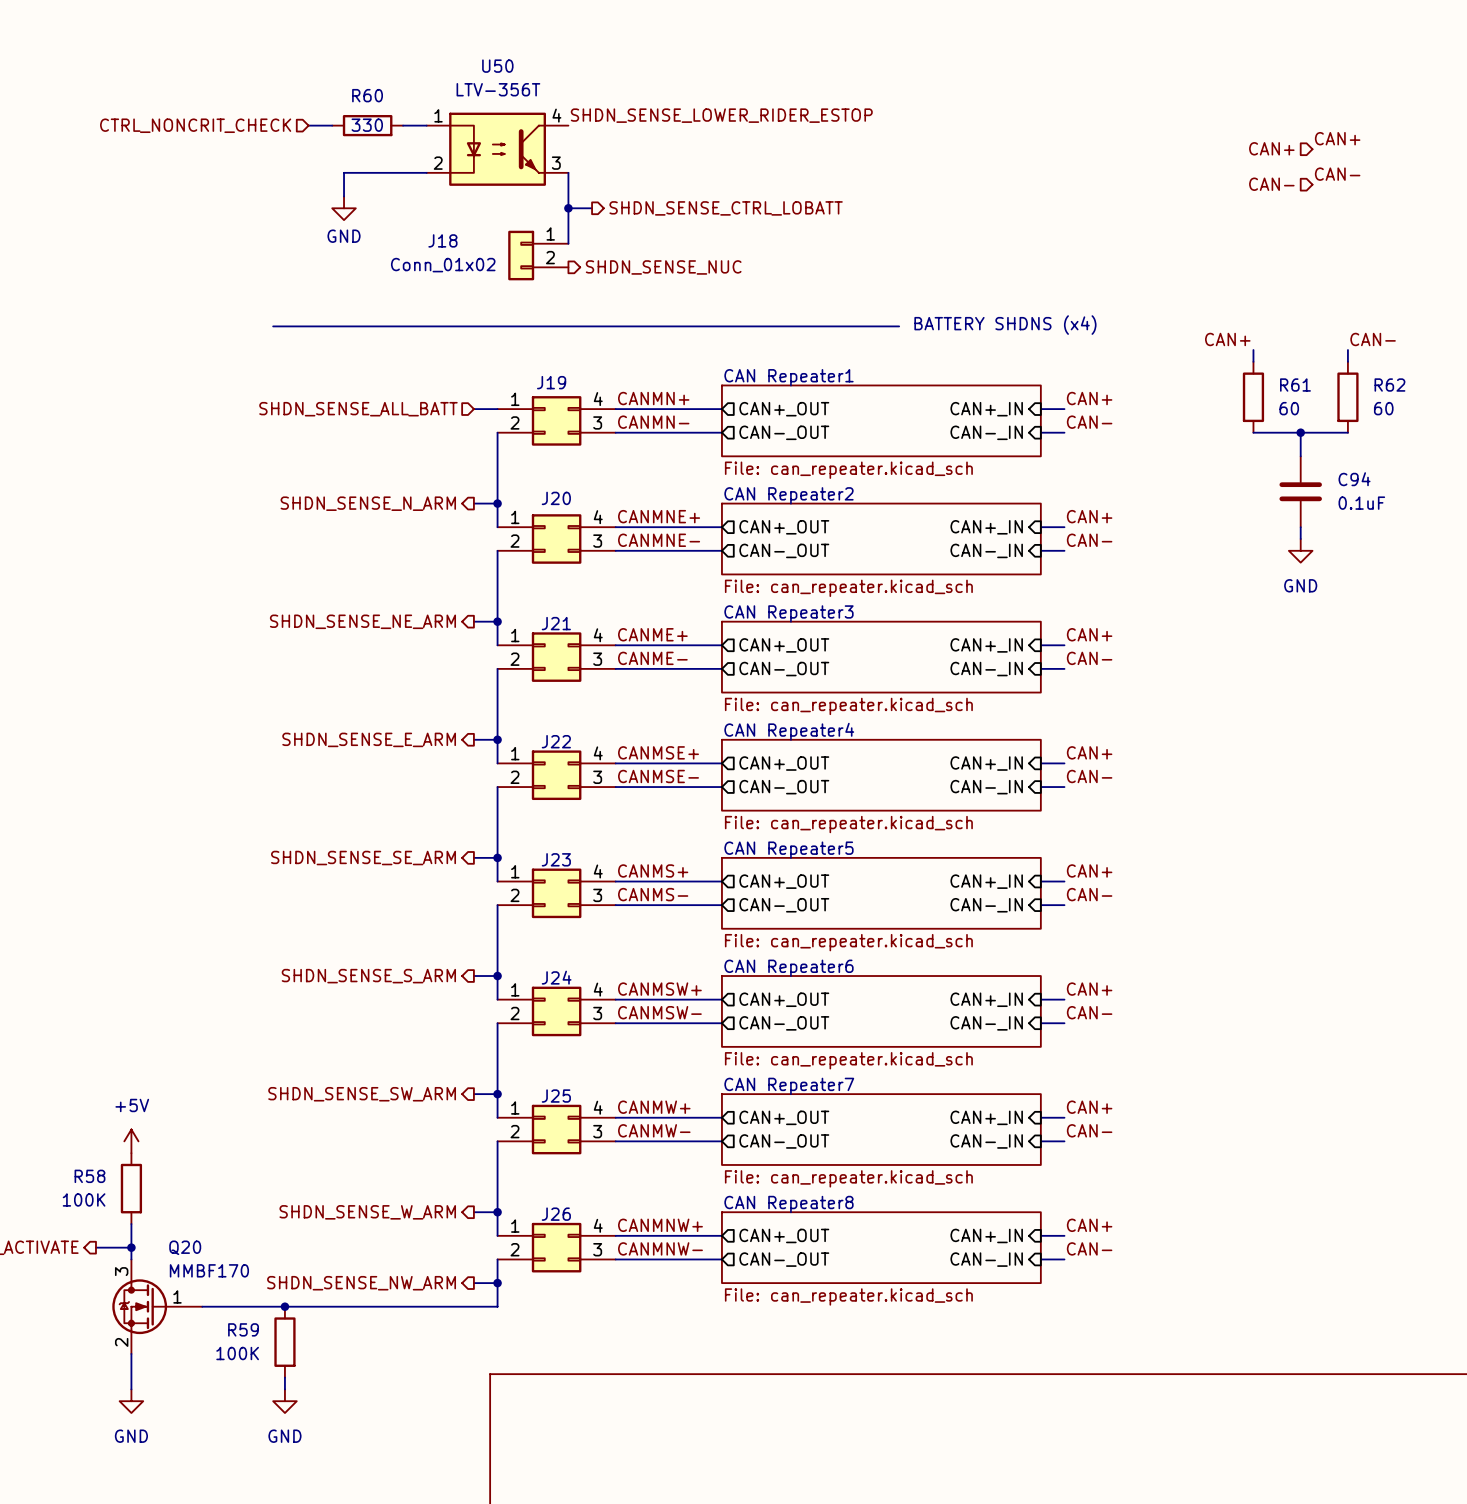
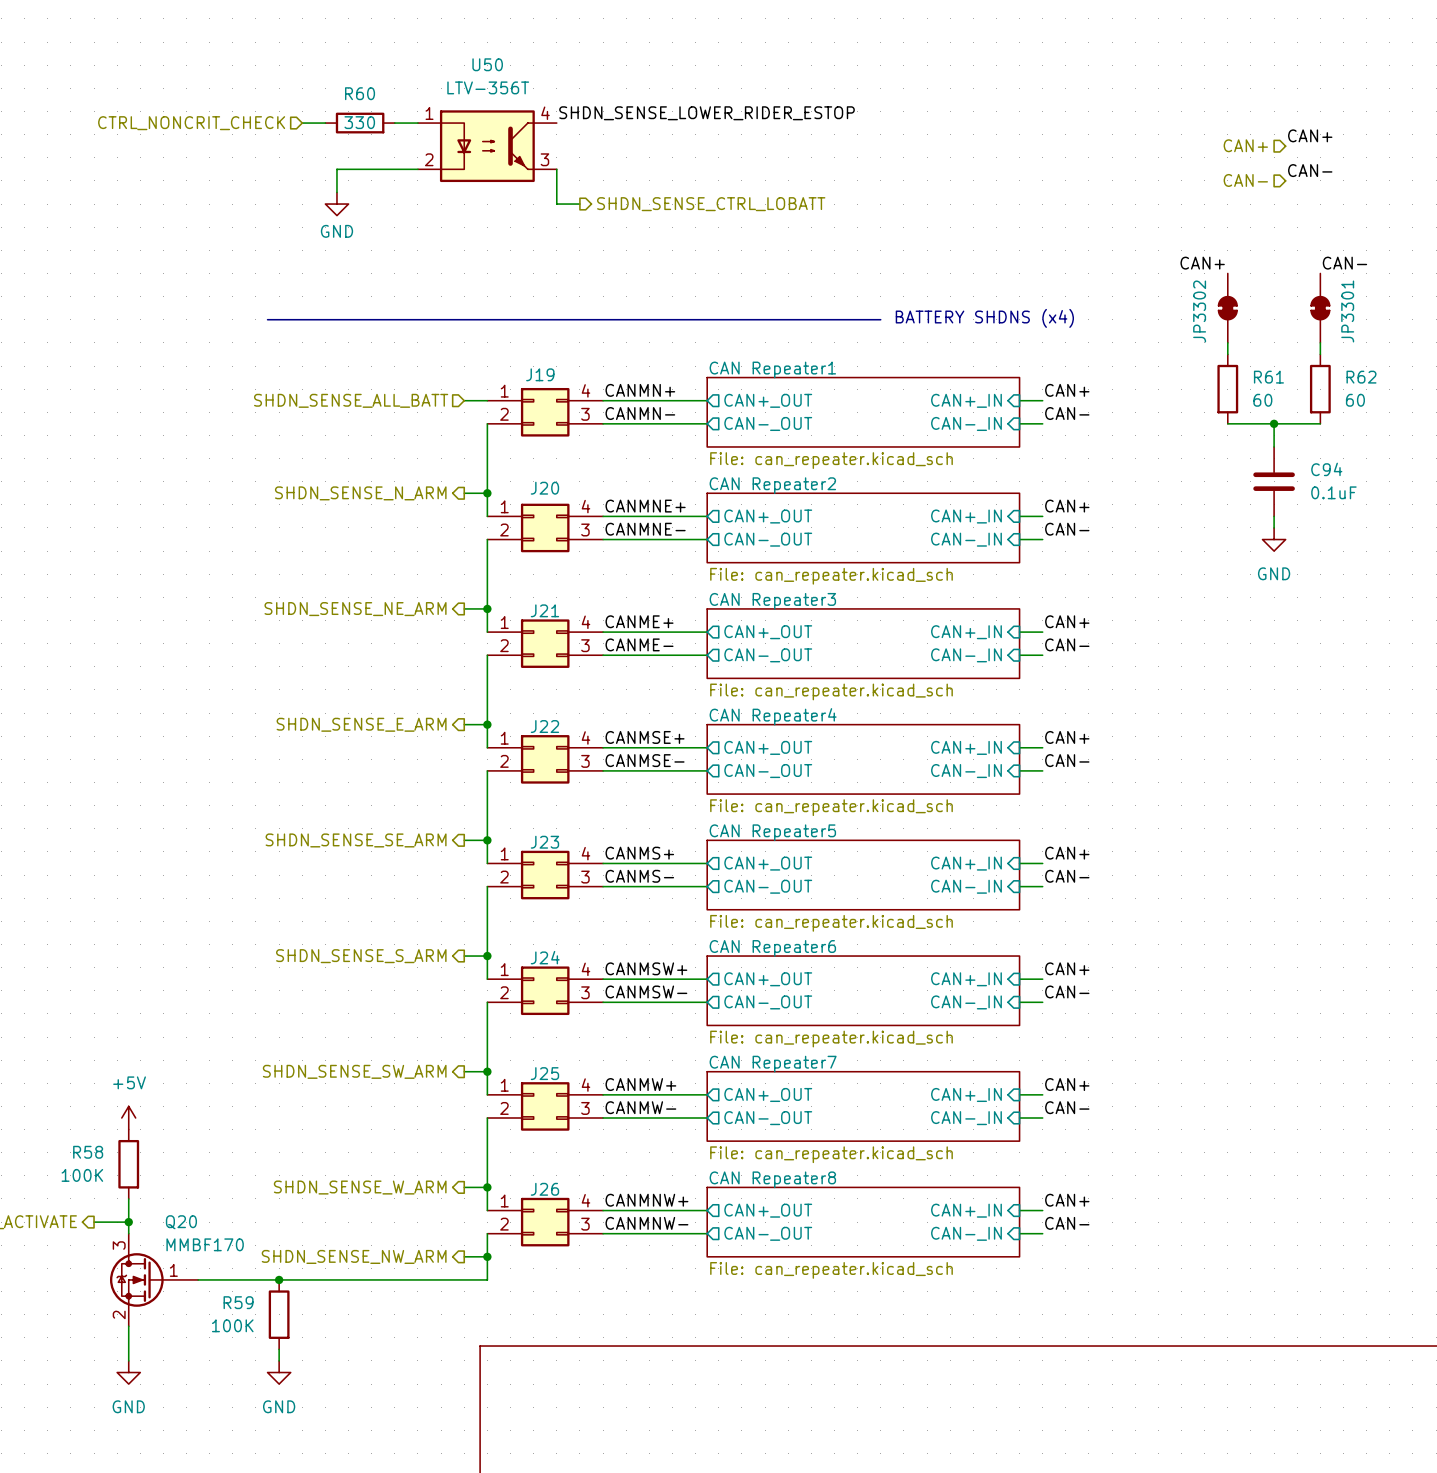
wire: (568, 208) (568, 243) -> none
junction: (568, 208) -> none
J18: Conn_01x02 (538, 255) -> none
hierarchical label: SHDN_SENSE_NUC (663, 267) -> none
JP3302: none -> (1227, 308)
JP3301: none -> (1320, 308)
label position: CAN+ (1227, 339) -> CAN+ (1202, 263)
label position: CAN- (1373, 339) -> CAN- (1344, 263)

